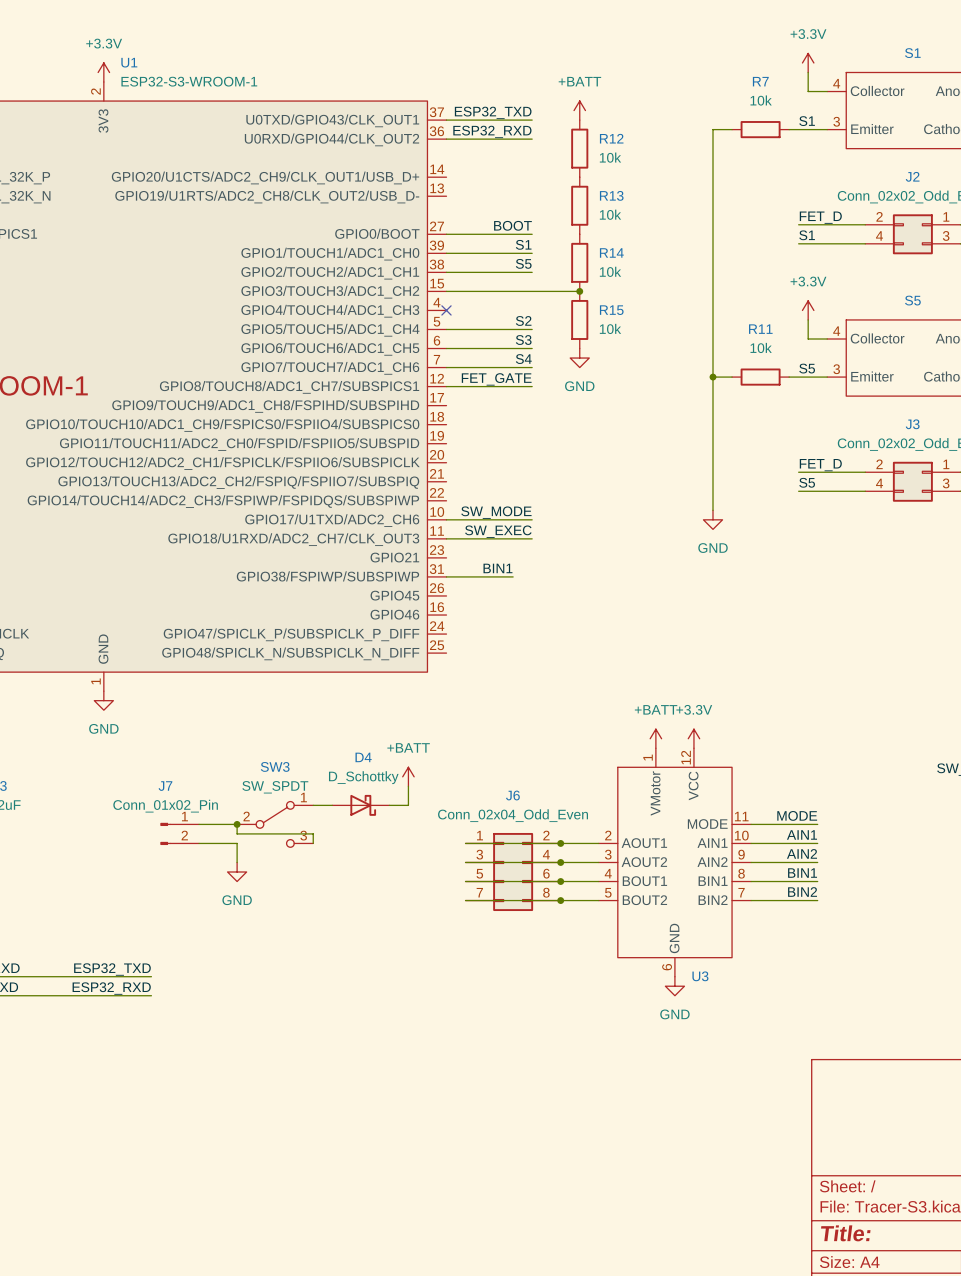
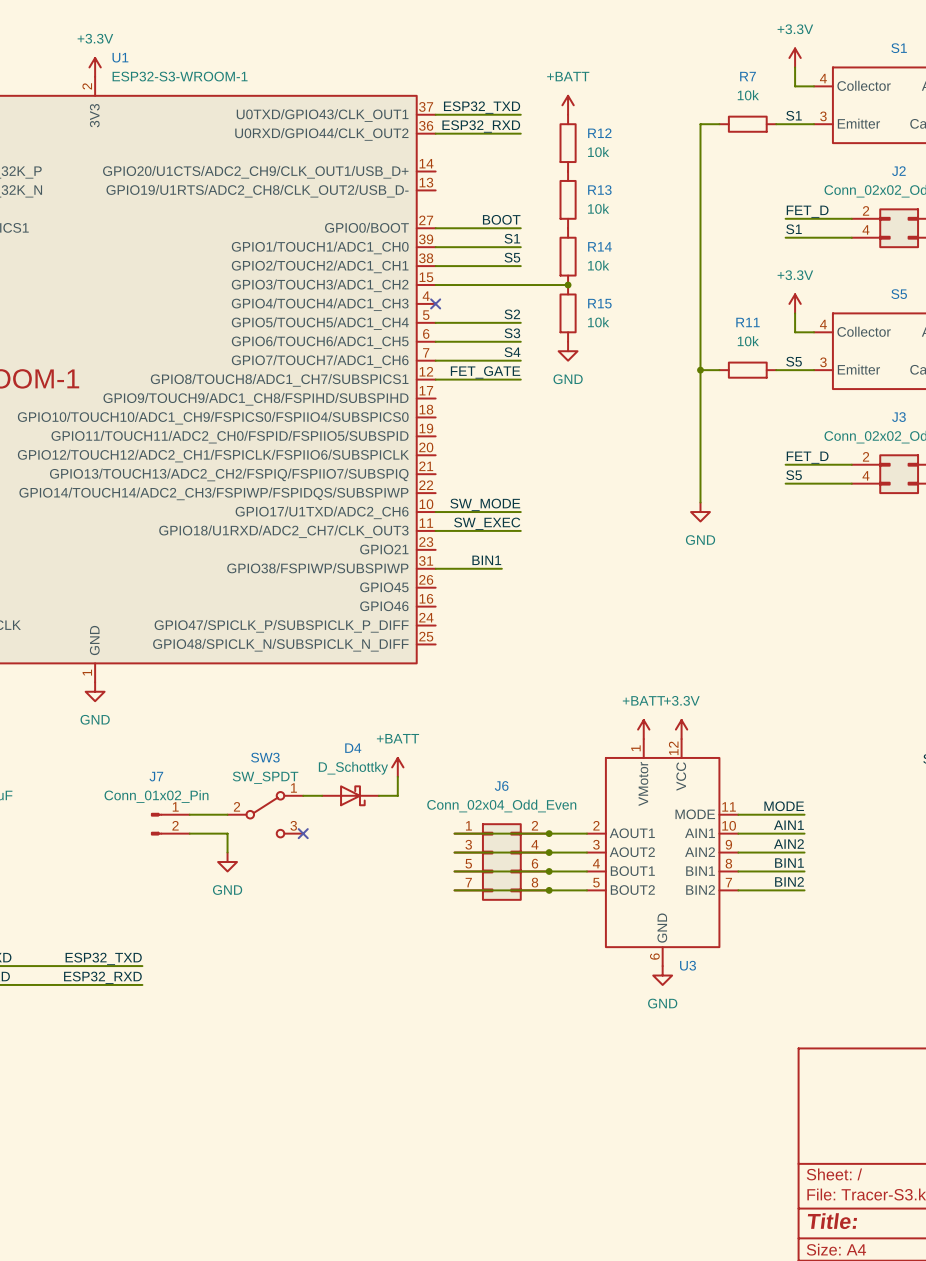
wire: (237, 824) (237, 833) (313, 833) (313, 843) -> none
junction: (237, 824) -> none
no-connect mark: none -> (303, 833)

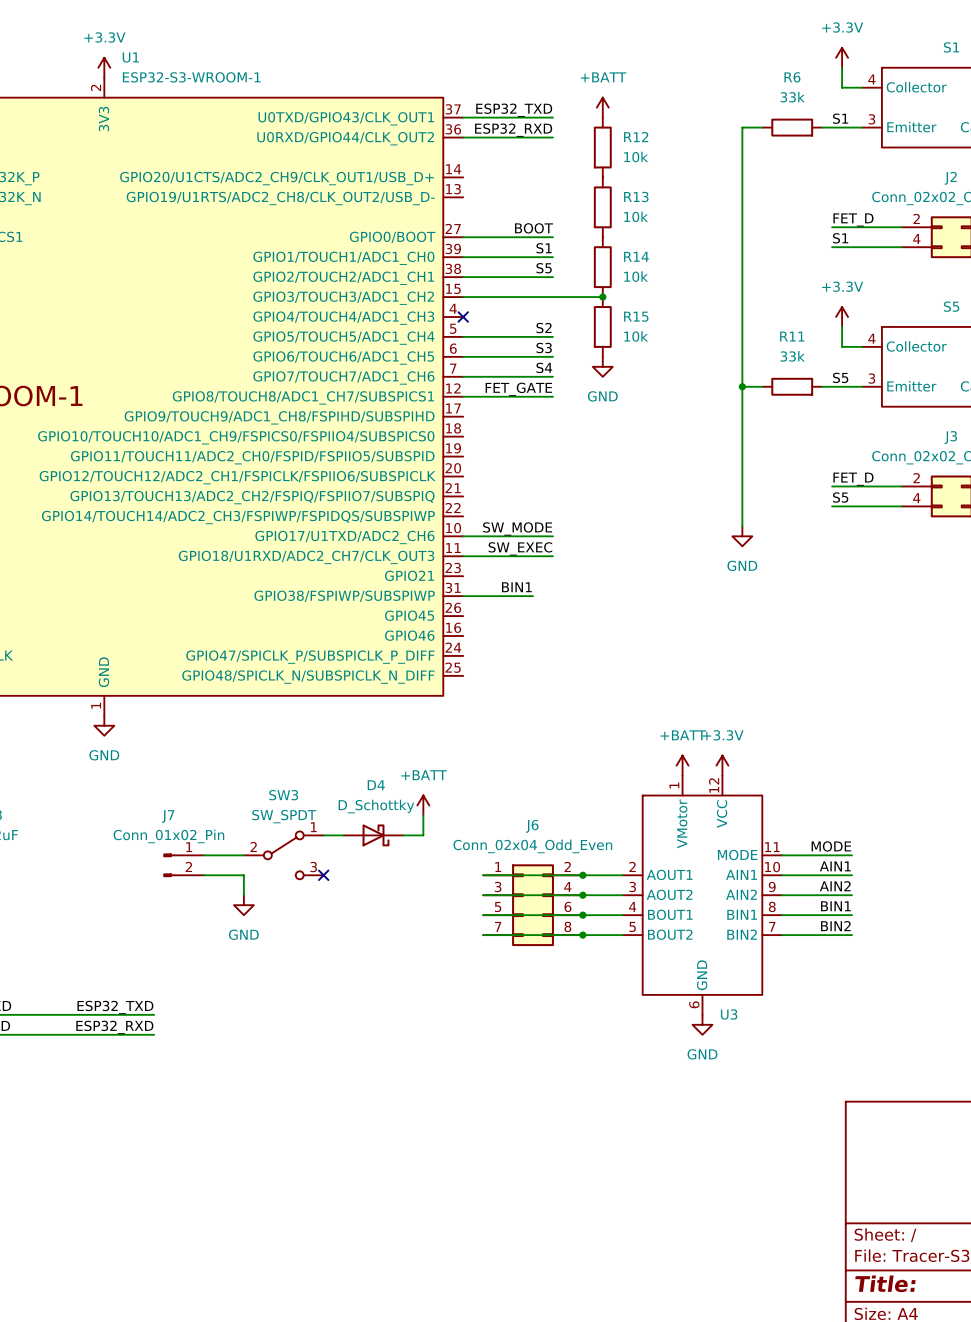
R7 name: R7 (748, 76) -> R6 (792, 77)
R7 value: 10k (748, 95) -> 33k (792, 97)
R11 value: 10k (748, 341) -> 33k (792, 356)

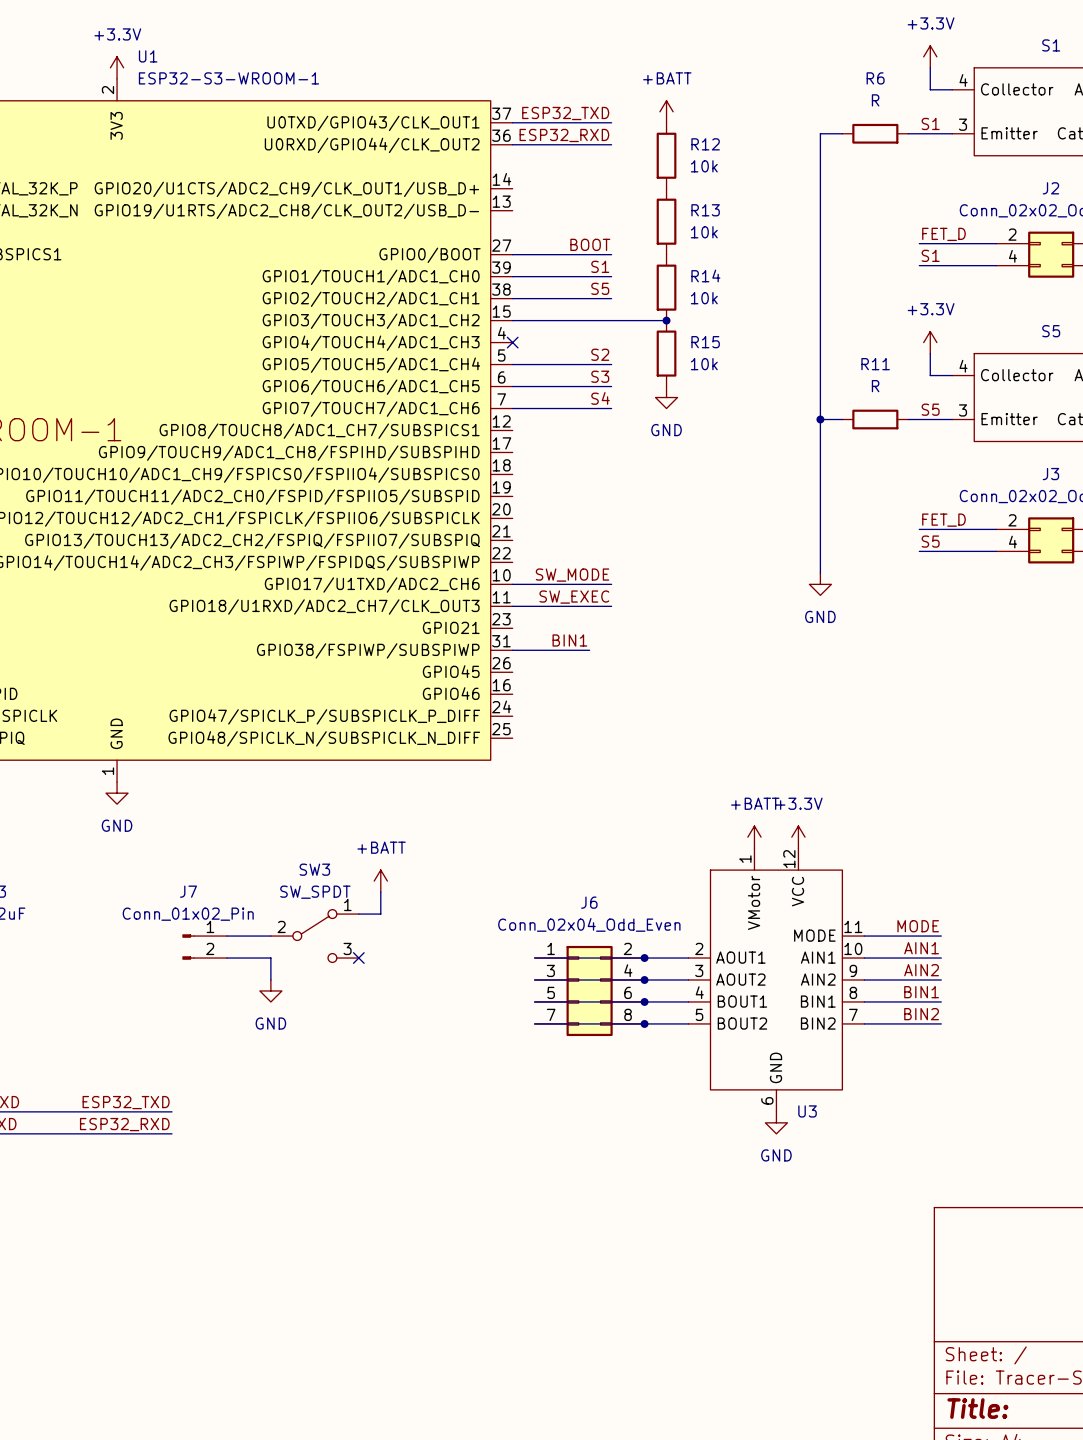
R6 value: 33k (792, 97) -> R (875, 100)
R11 value: 33k (792, 356) -> R (875, 386)
label: FET_GATE (518, 389) -> none
wire: (463, 396) (552, 396) -> none
power symbol position: +BATT (423, 805) -> +BATT (380, 881)
wire: none -> (380, 892) (380, 914)
wire: (423, 815) (423, 835) (403, 835) -> none
D4: D_Schottky (373, 835) -> none

